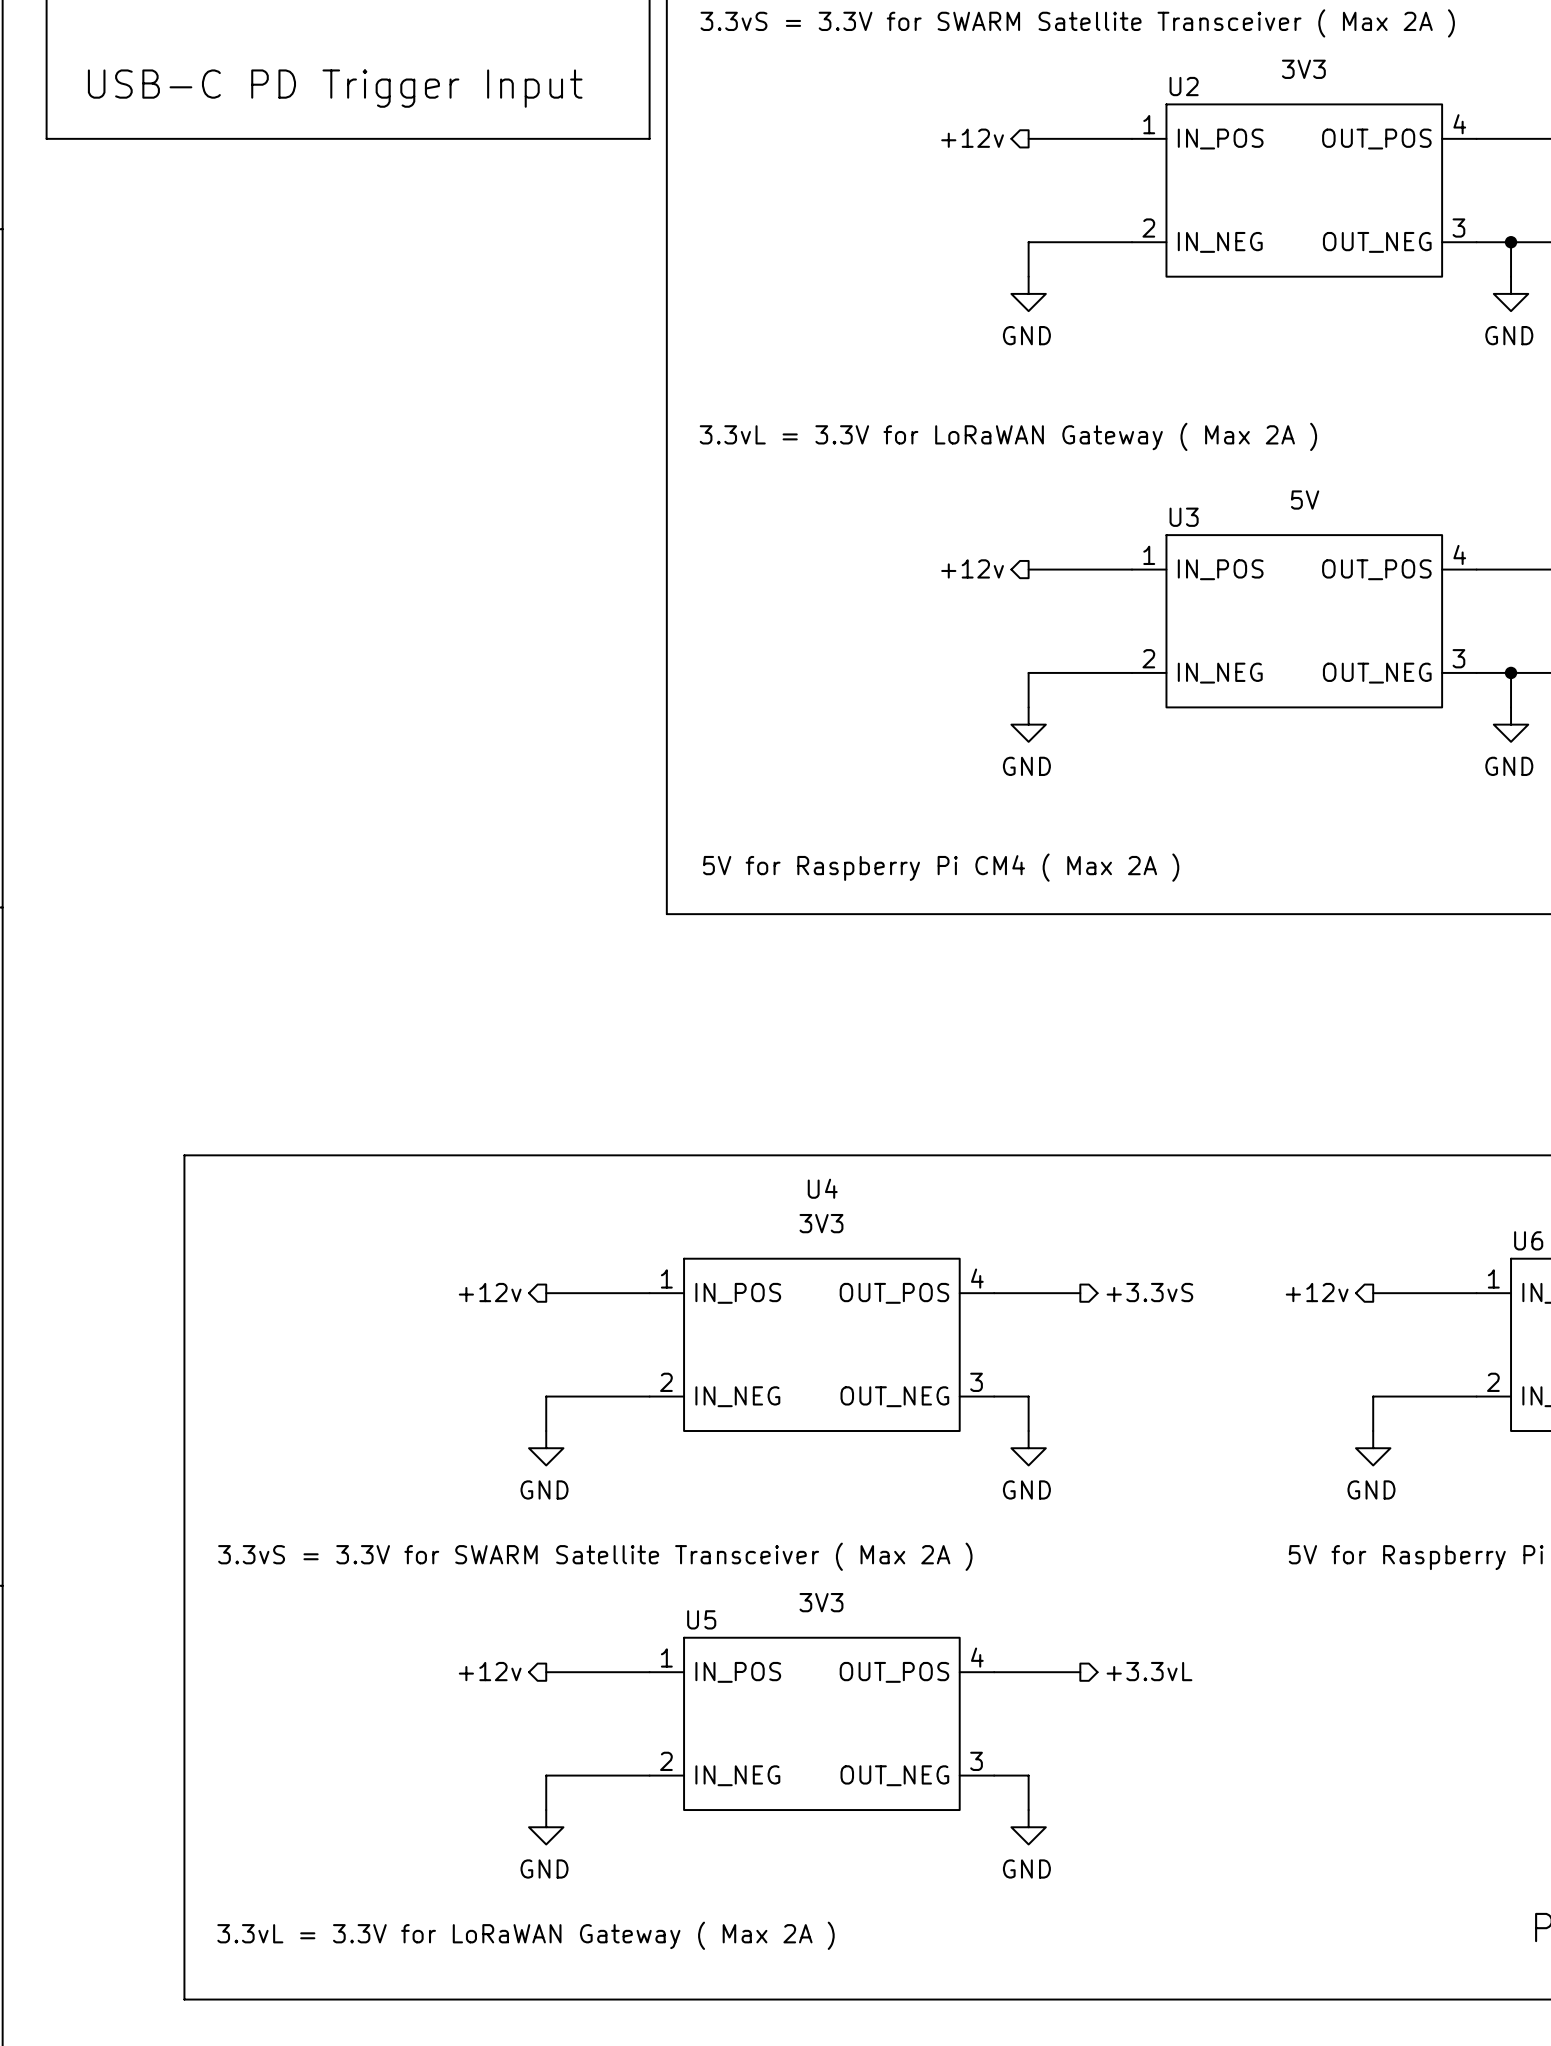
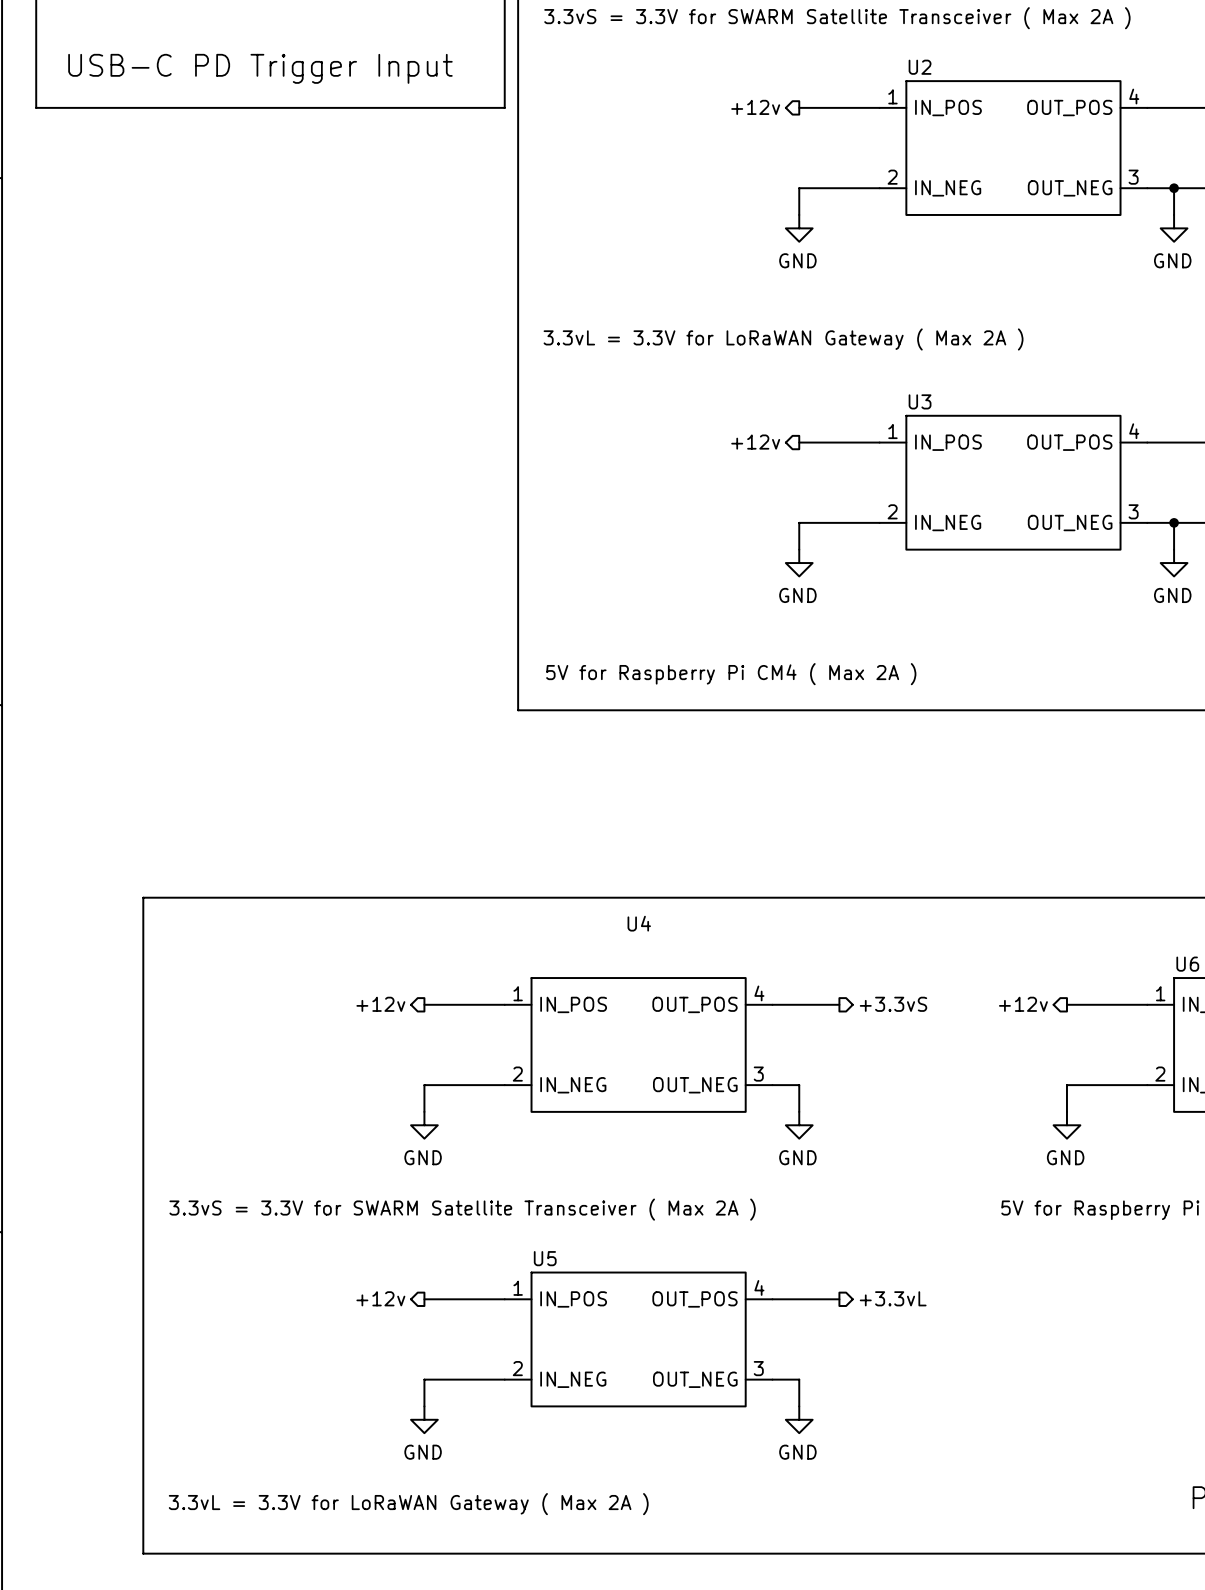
U2 value: 3V3 (1303, 69) -> none
U3 value: 5V (1305, 500) -> none
U4 value: 3V3 (821, 1223) -> none
U5 value: 3V3 (821, 1602) -> none

